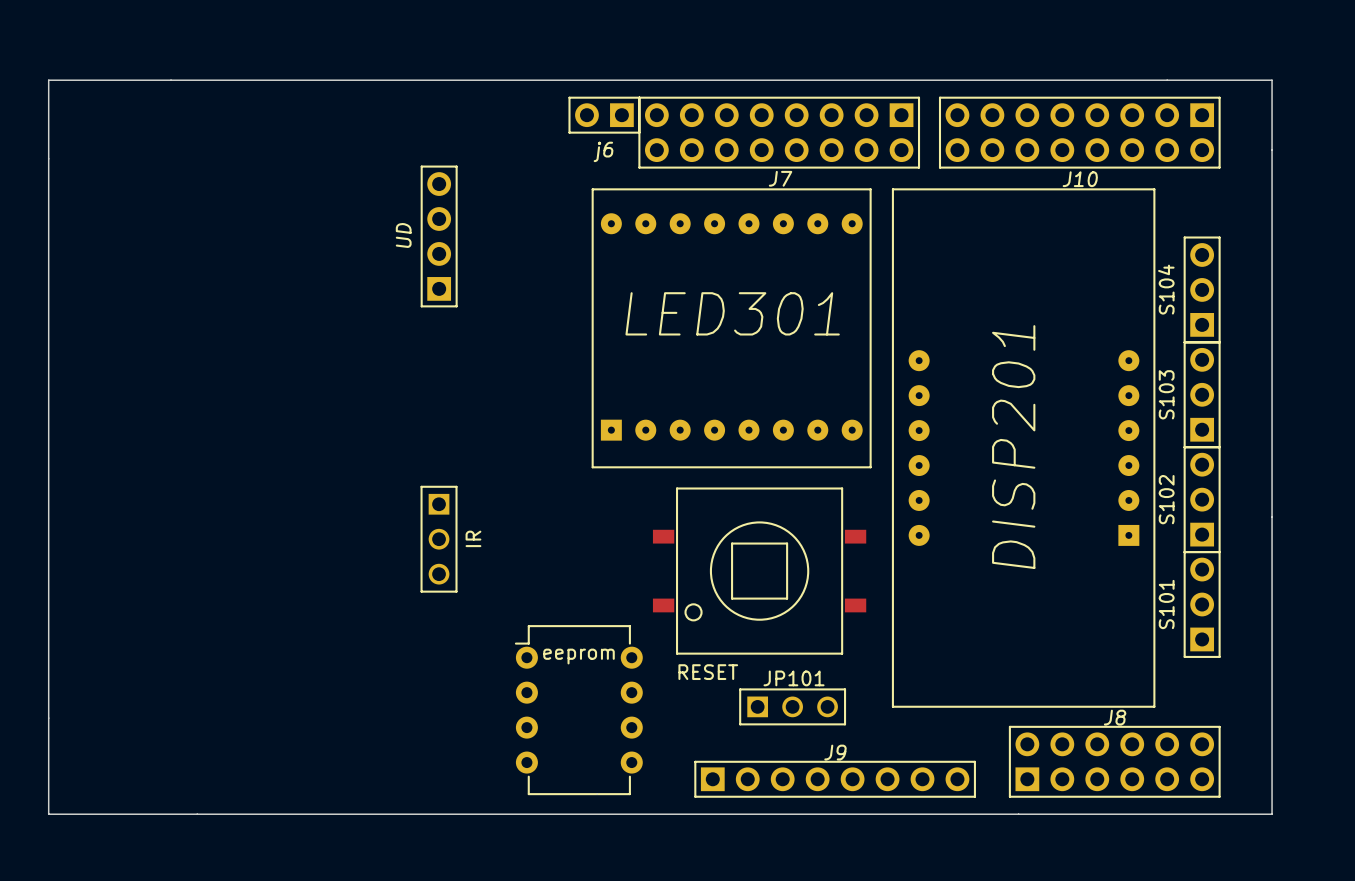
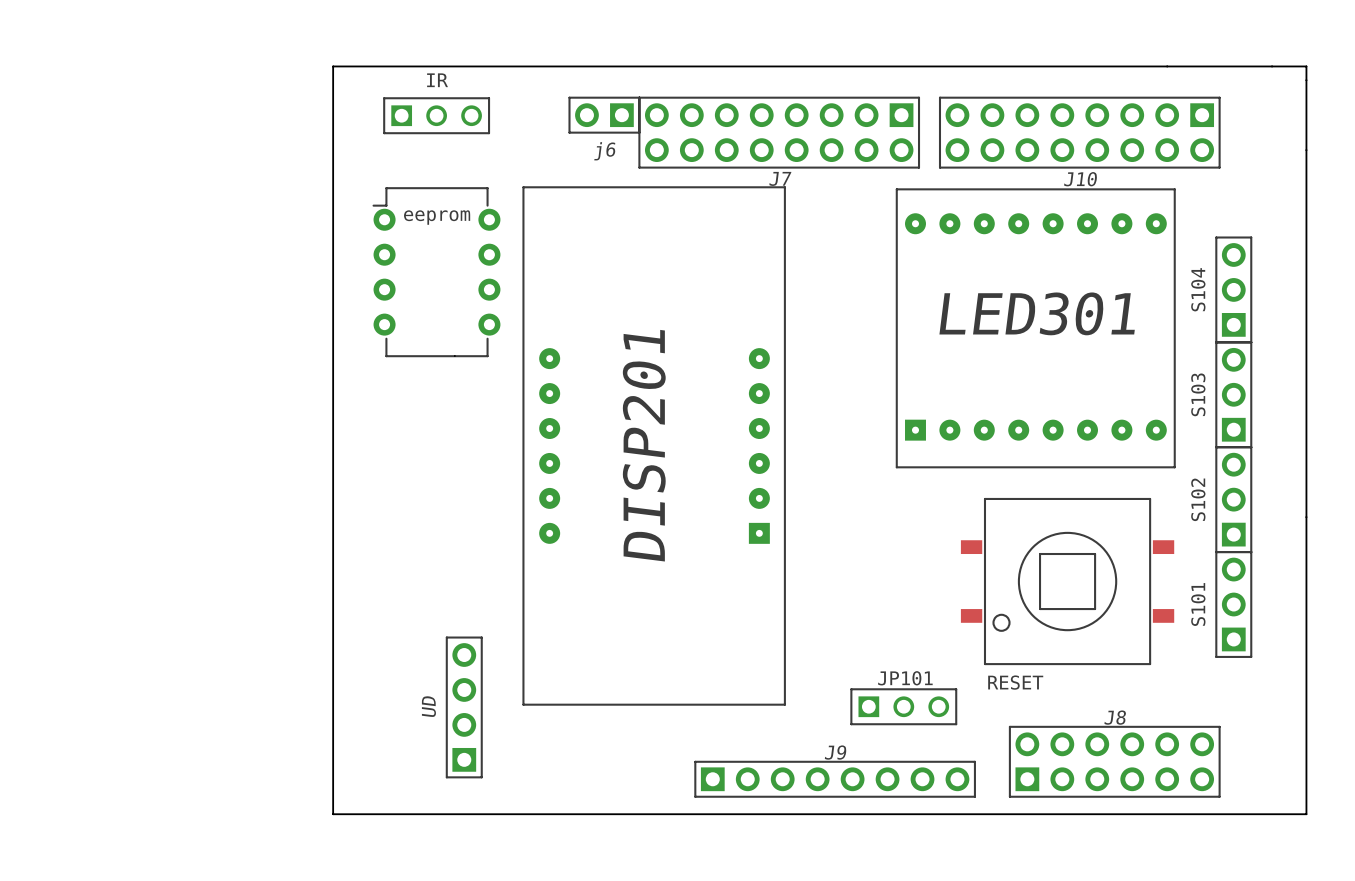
IR: none -> (436, 115)
UD: (439, 236) -> none
eeprom: none -> (436, 272)
S104 position: (1202, 289) -> (1233, 289)
LED301 position: (731, 328) -> (1035, 328)
S103 position: (1202, 394) -> (1233, 394)
DISP201 position: (1023, 448) -> (654, 445)
S102 position: (1202, 499) -> (1233, 499)
IR: (439, 539) -> none
RESET position: (759, 571) -> (1067, 581)
S101 position: (1202, 604) -> (1233, 604)
JP101 position: (792, 706) -> (903, 706)
UD: none -> (464, 707)
eeprom: (578, 710) -> none
board edge: (333, 814) (48, 814) (48, 80) (1272, 80) (1272, 814) -> (333, 814) (333, 66) (1306, 66) (1306, 814) (1272, 814)

